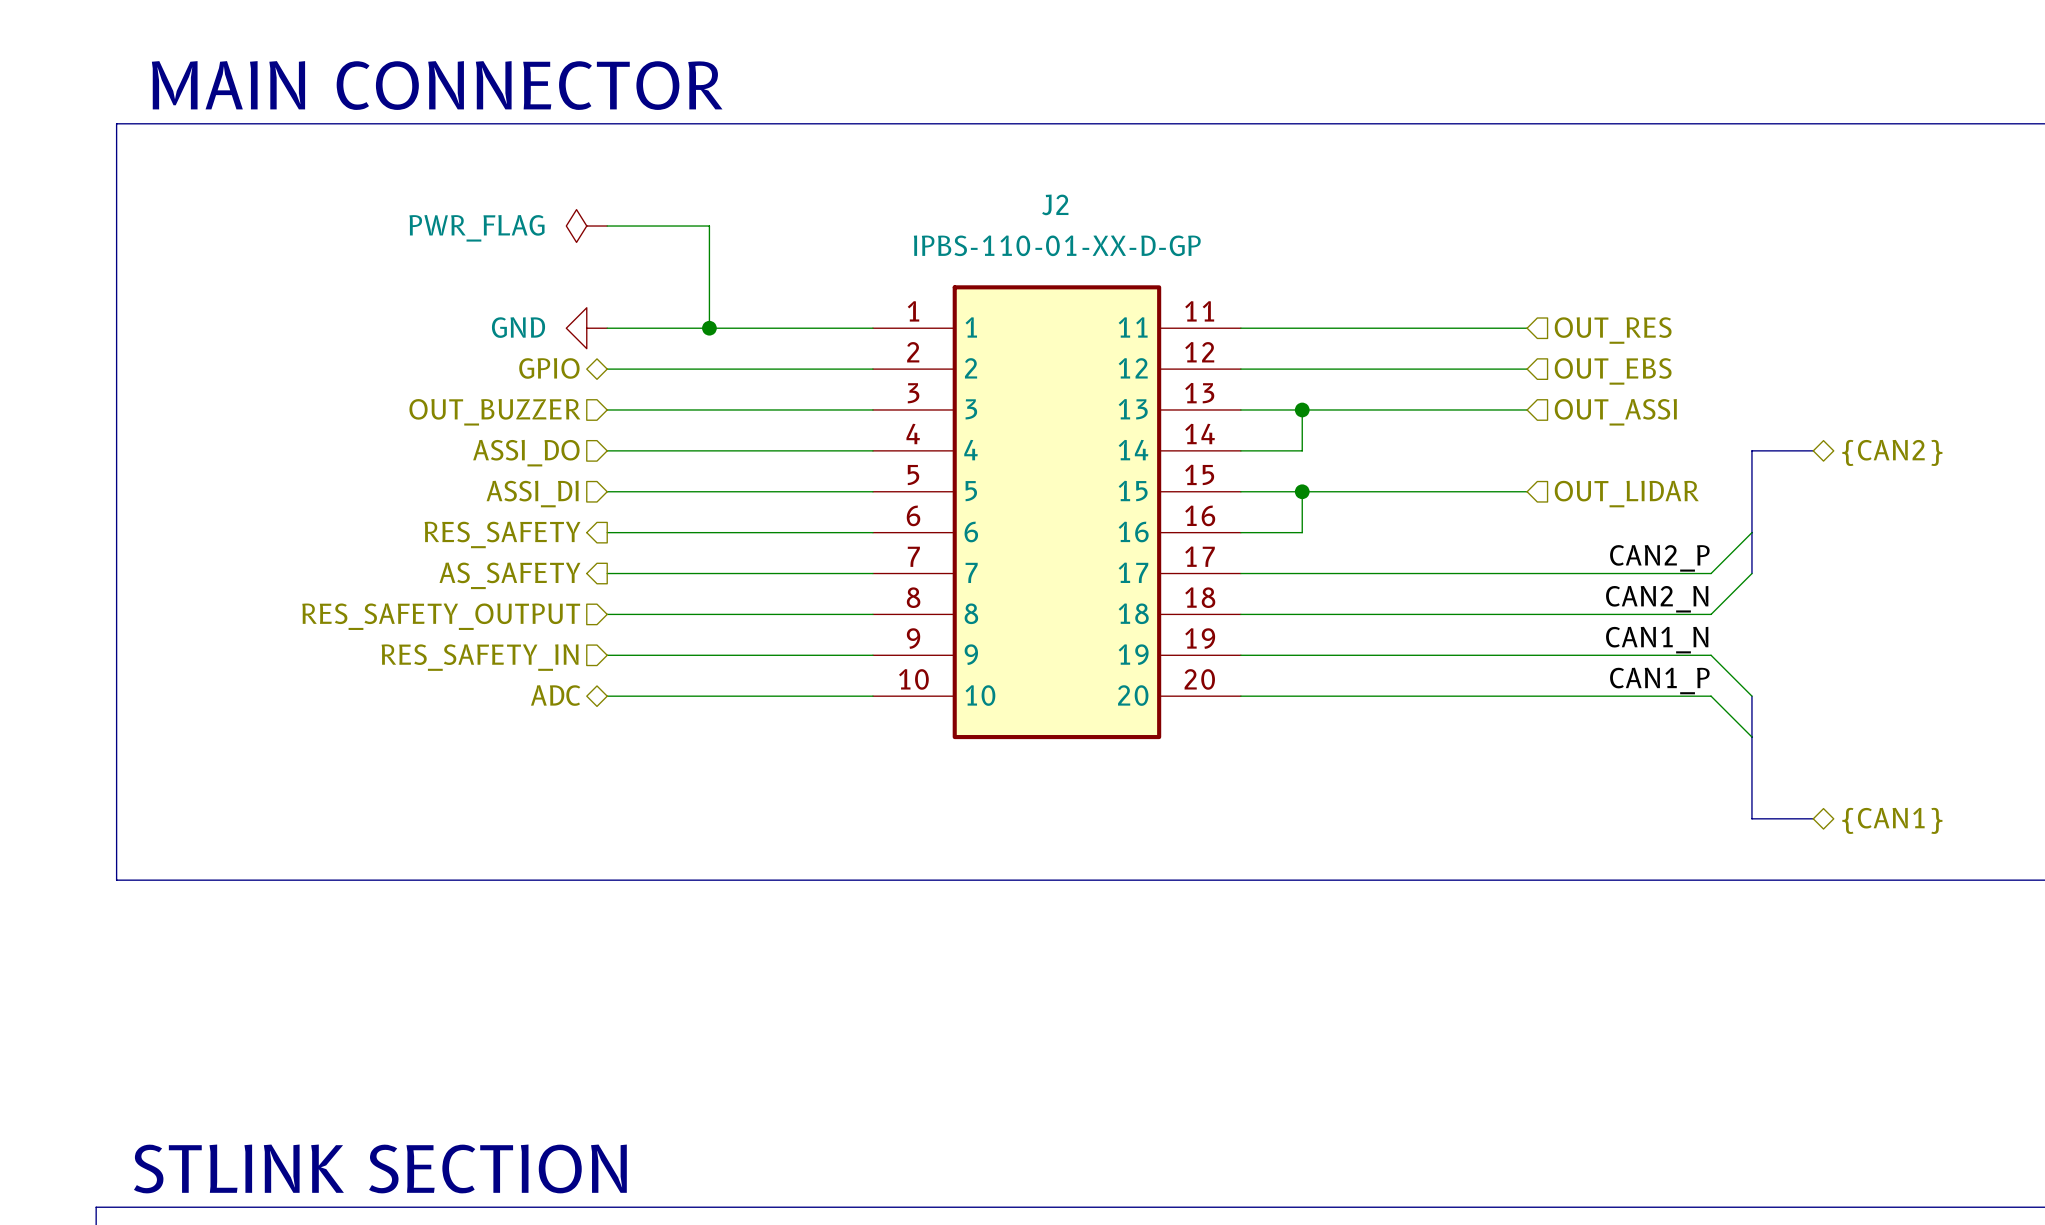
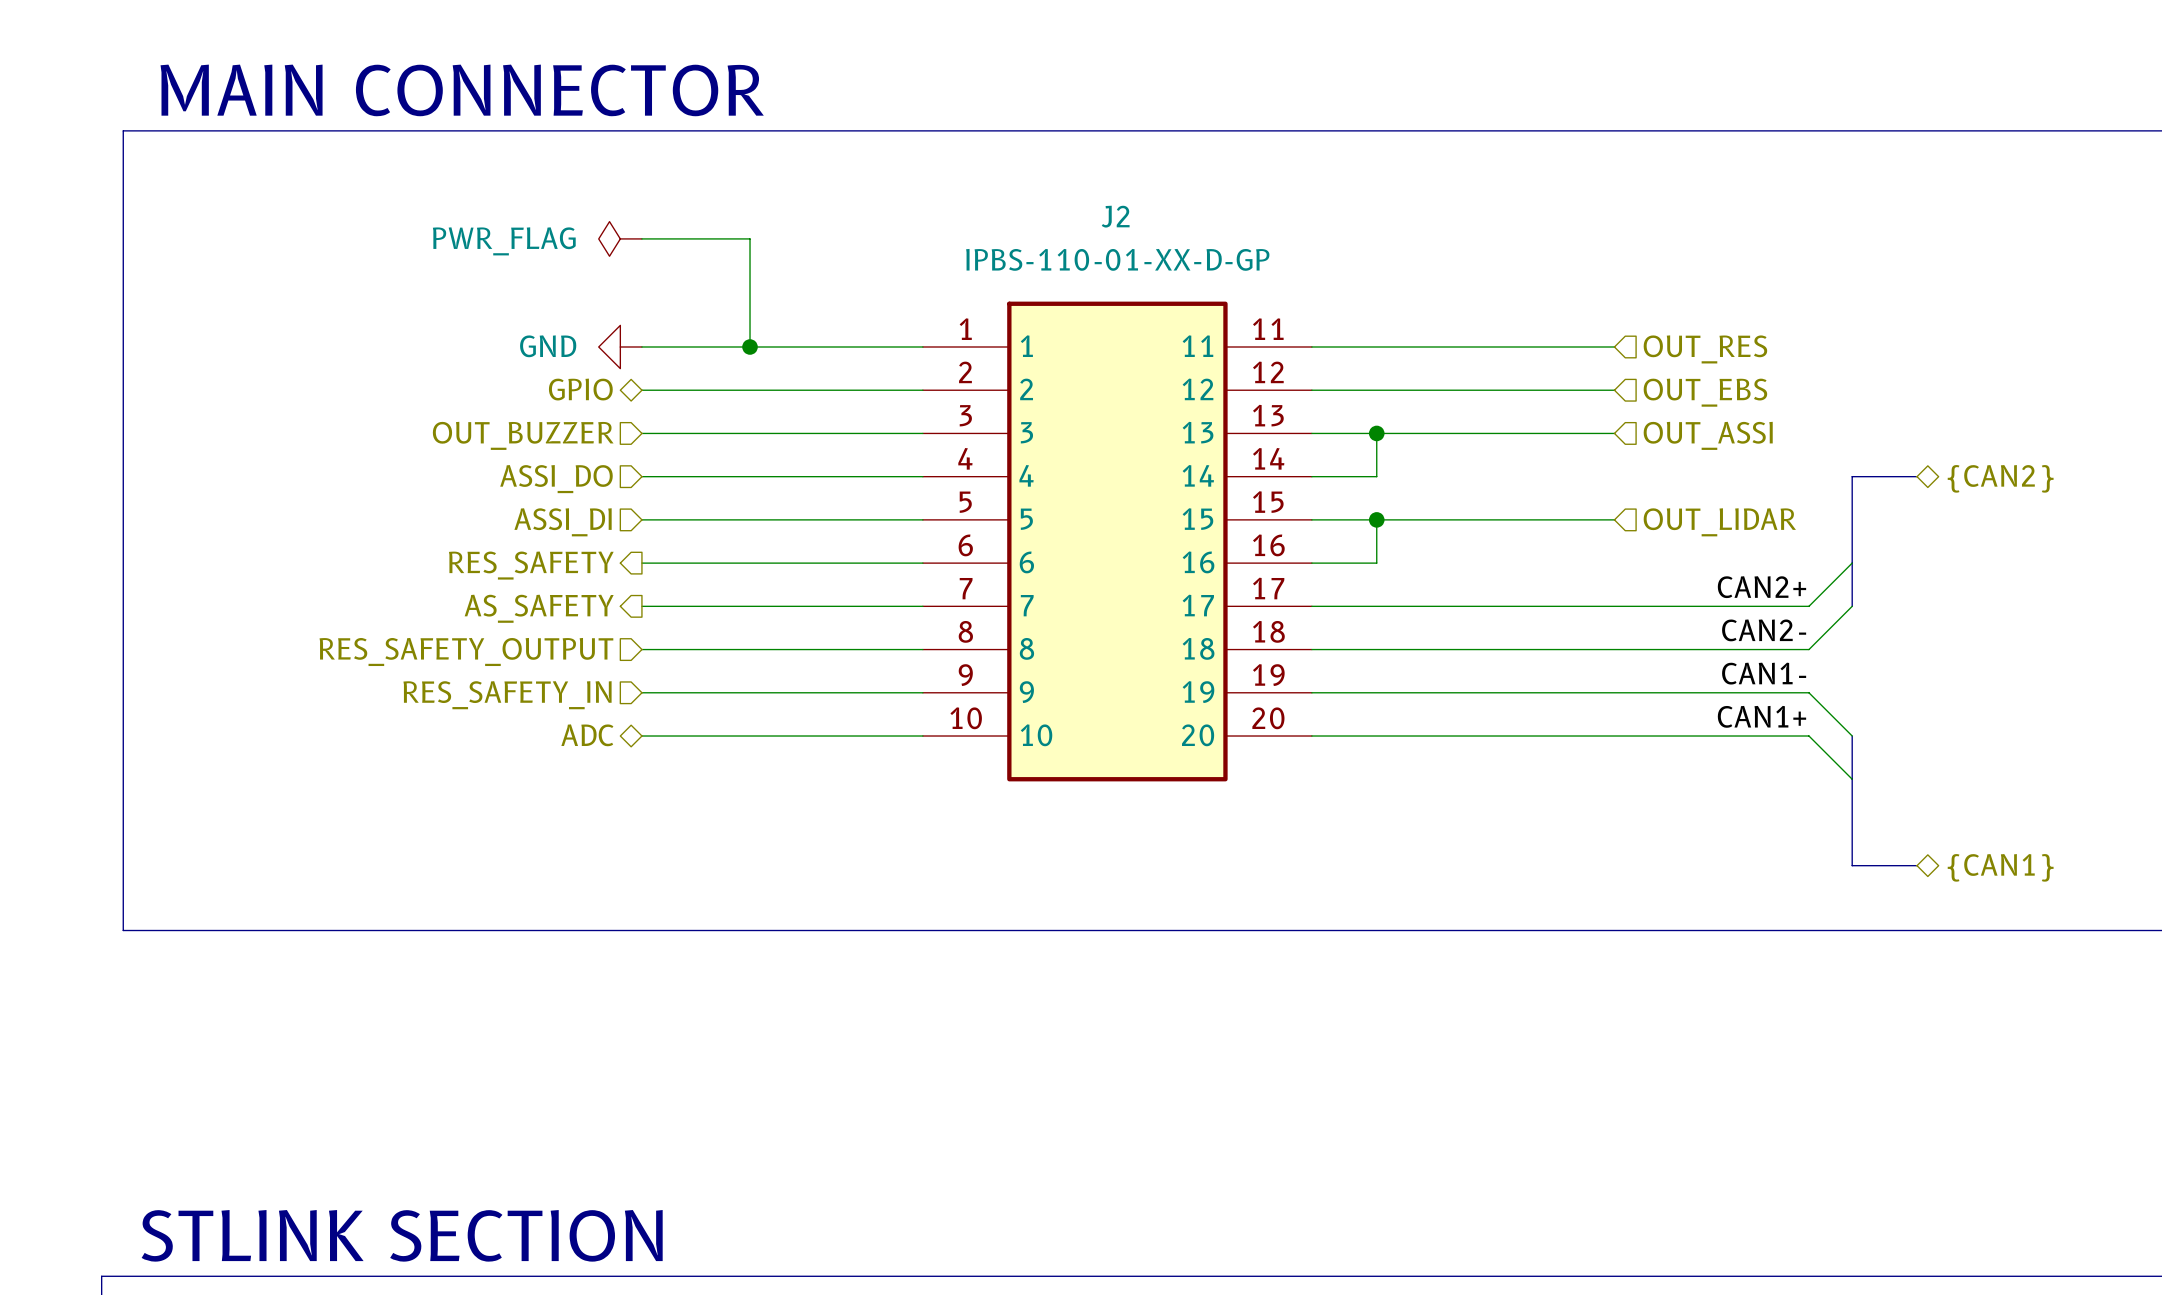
label: CAN2_P (1659, 558) -> CAN2+ (1761, 587)
label: CAN2_N (1657, 599) -> CAN2- (1764, 630)
label: CAN1_N (1657, 640) -> CAN1- (1764, 673)
label: CAN1_P (1659, 680) -> CAN1+ (1761, 716)

